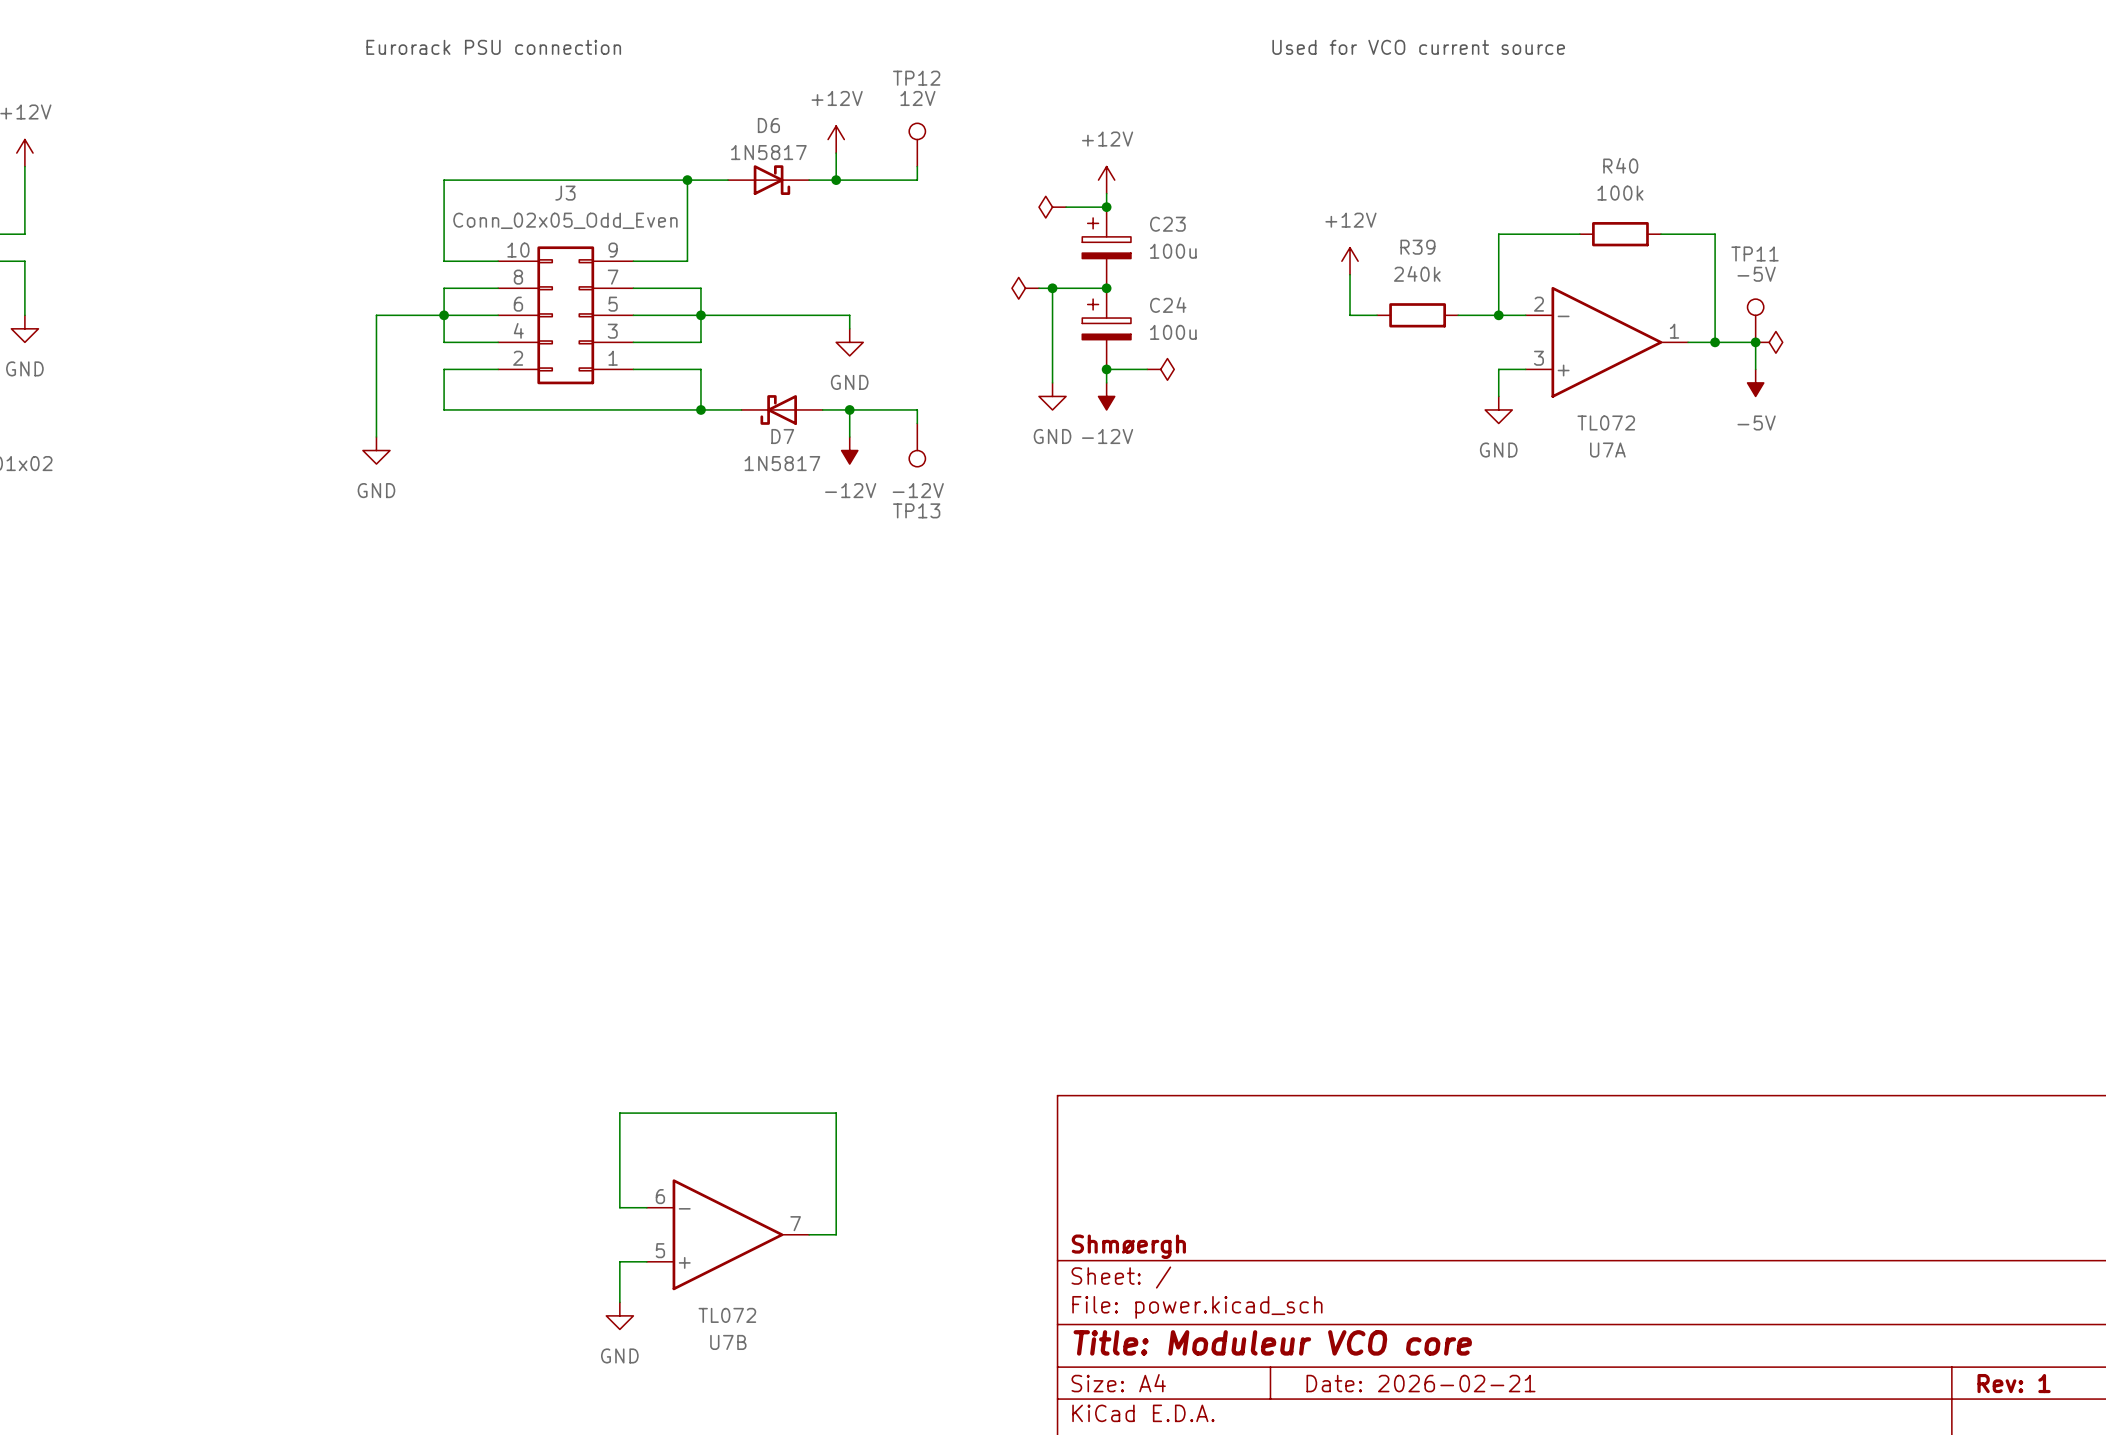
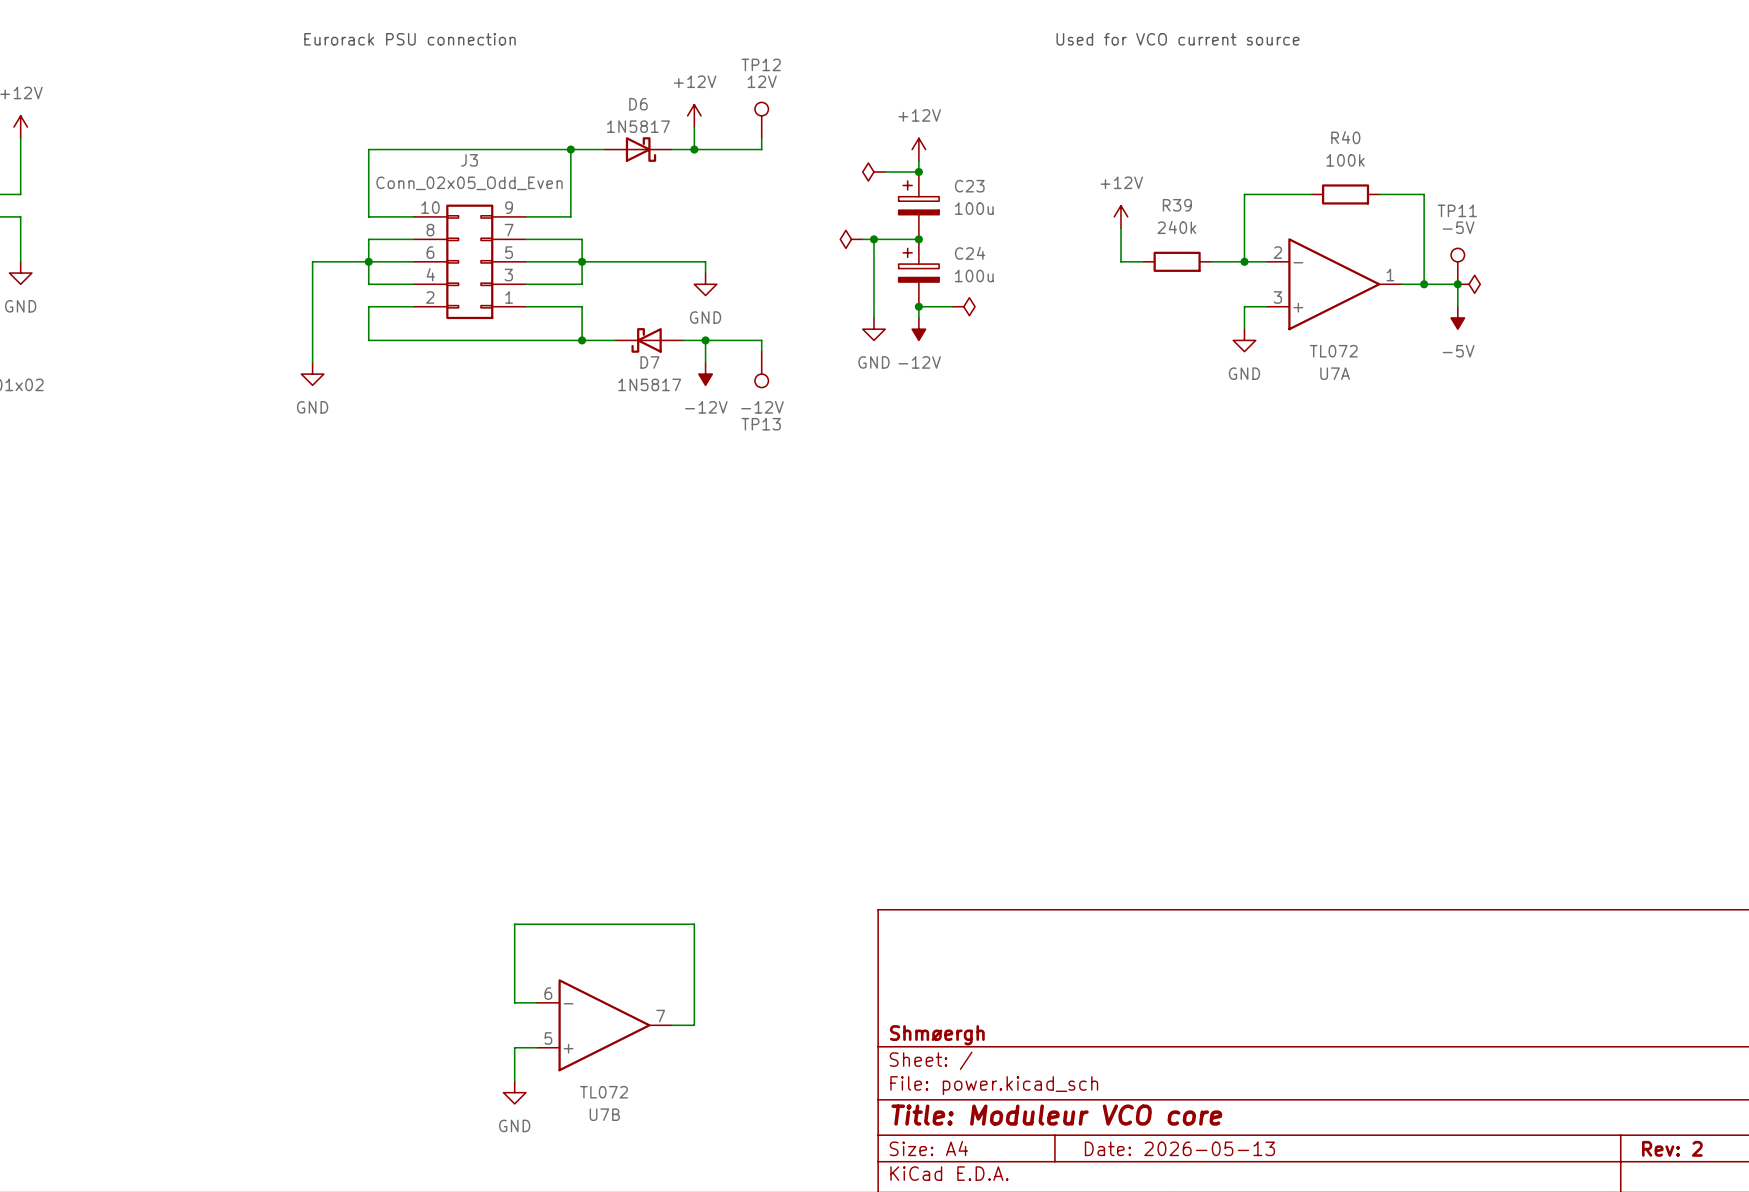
title block: Date: 2026-02-21 (1420, 1383) -> Date: 2026-05-13 (1179, 1148)
title block: Rev: 1 (2014, 1383) -> Rev: 2 (1672, 1148)

